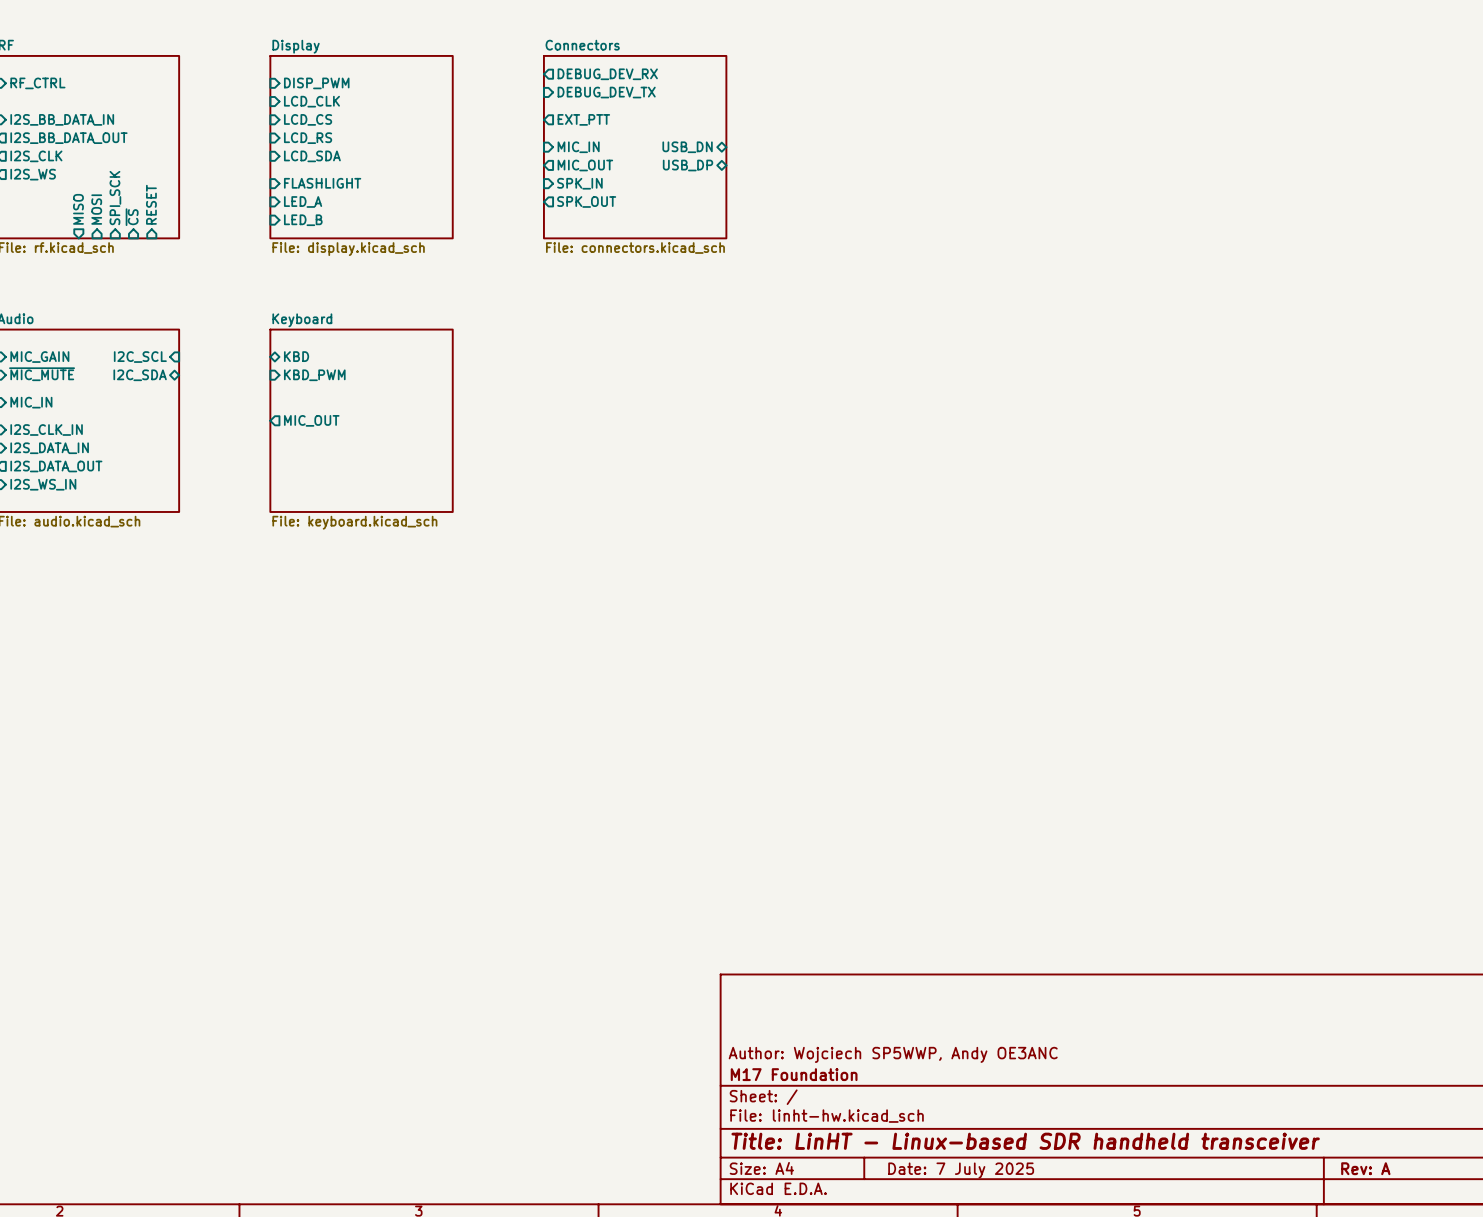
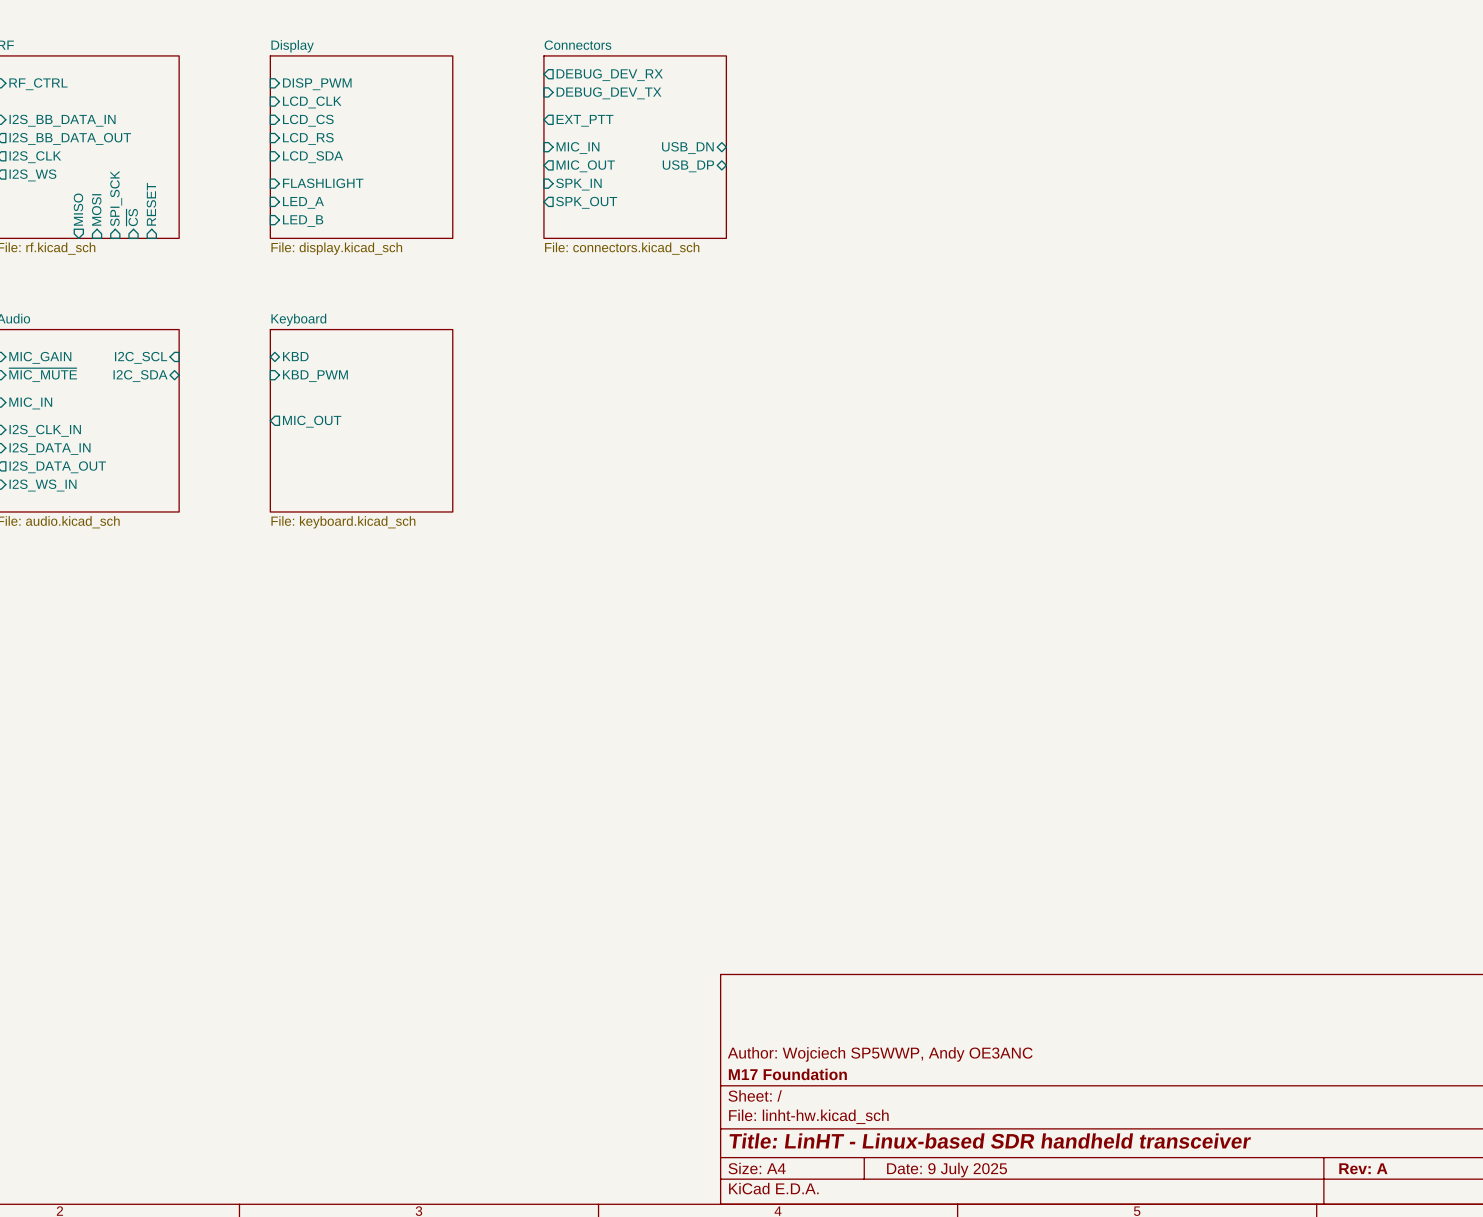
title block: Date: 7 July 2025 (961, 1170) -> Date: 9 July 2025 (947, 1170)

